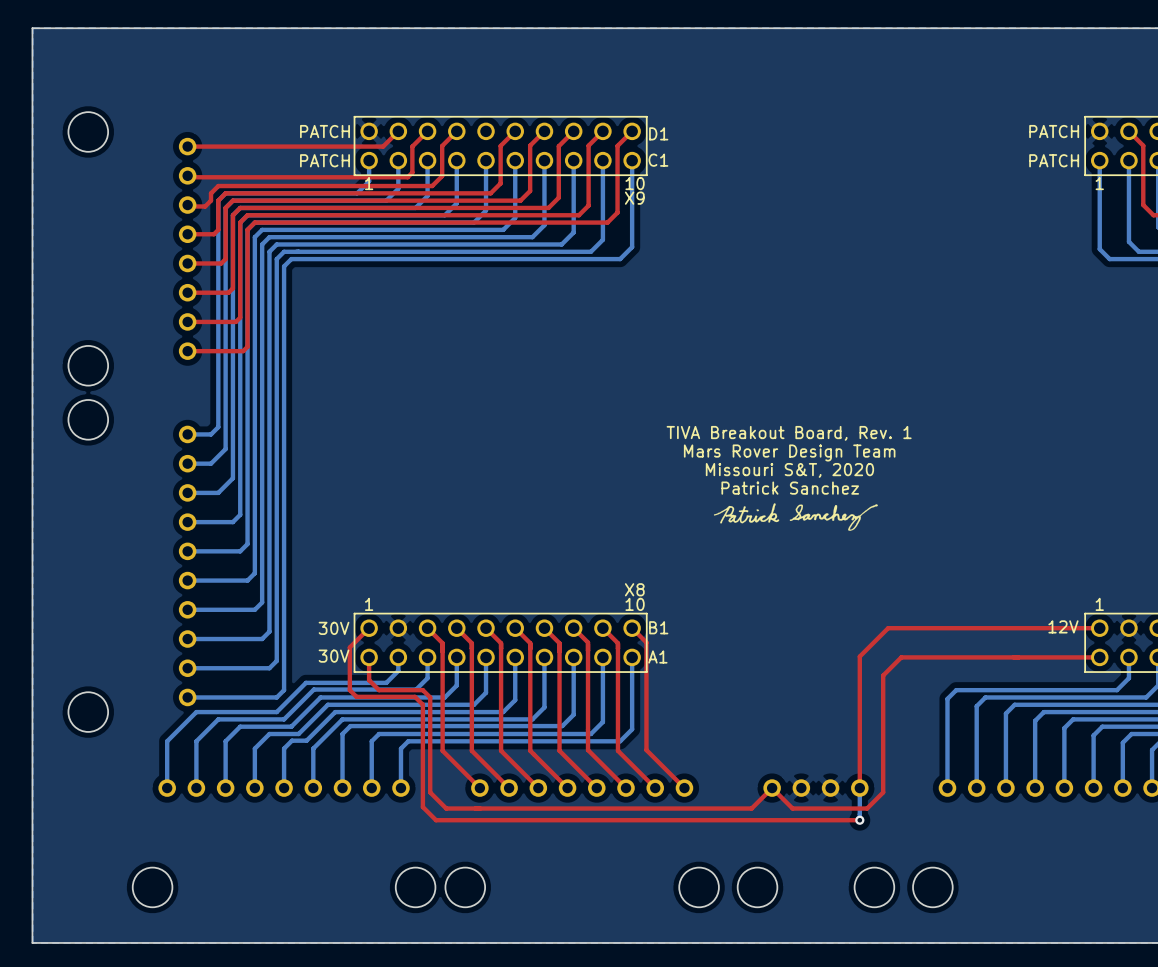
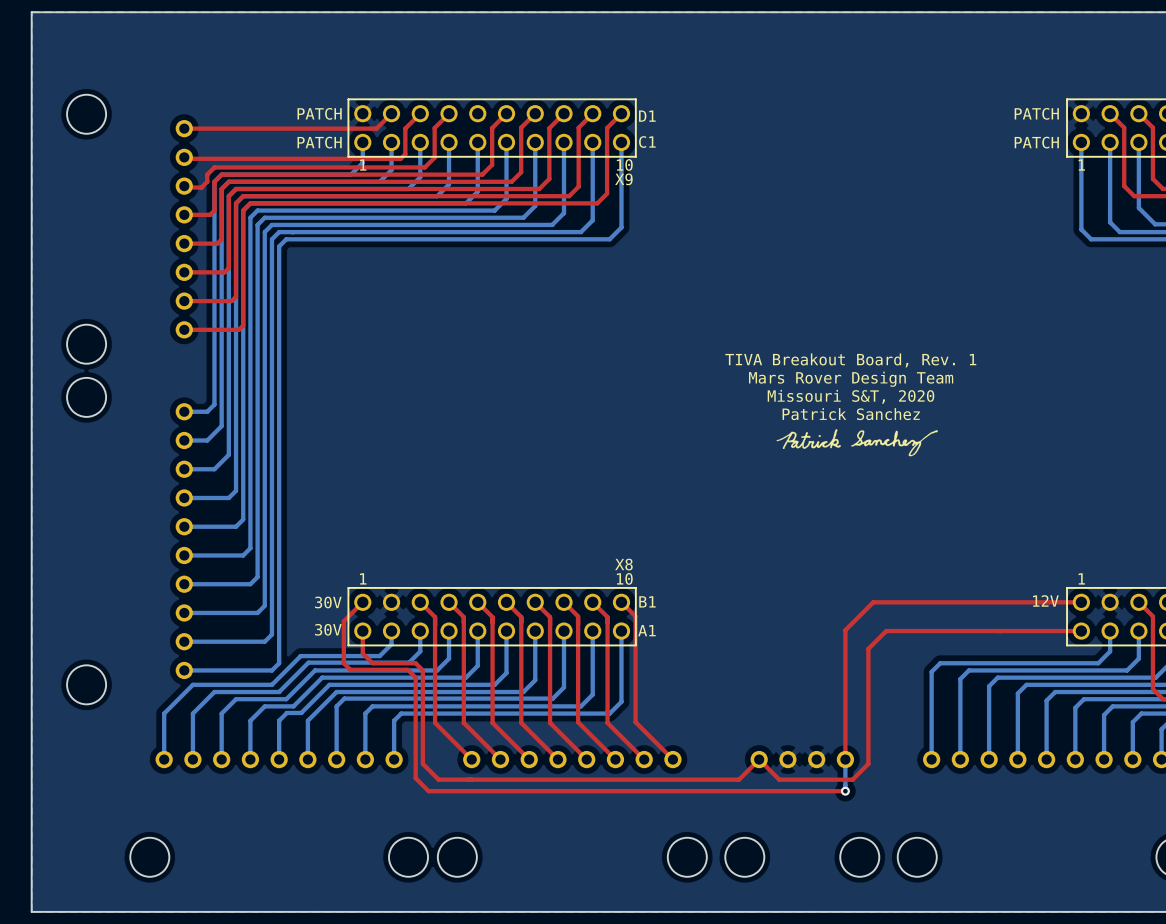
text position: TIVA Breakout Board, Rev. 1 (789, 433) -> TIVA Breakout Board, Rev. 1 (850, 360)
text position: Mars Rover Design Team (789, 452) -> Mars Rover Design Team (851, 379)
text position: Missouri S&T, 2020 (789, 470) -> Missouri S&T, 2020 (850, 396)
text position: Patrick Sanchez (790, 488) -> Patrick Sanchez (851, 414)
drawing position: (795, 517) -> (857, 442)

